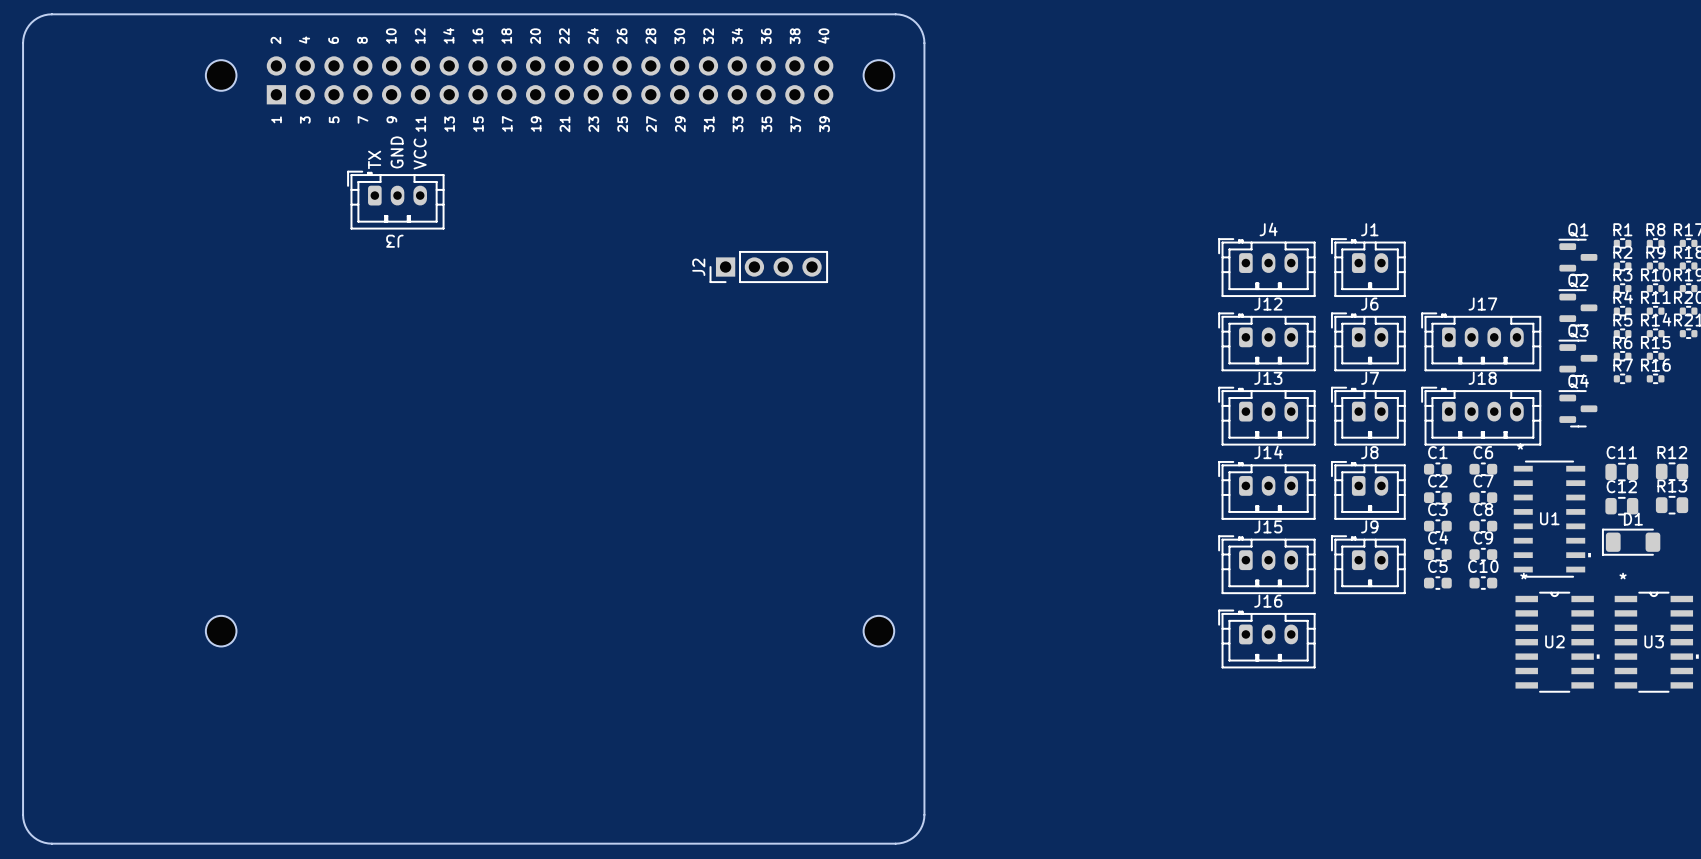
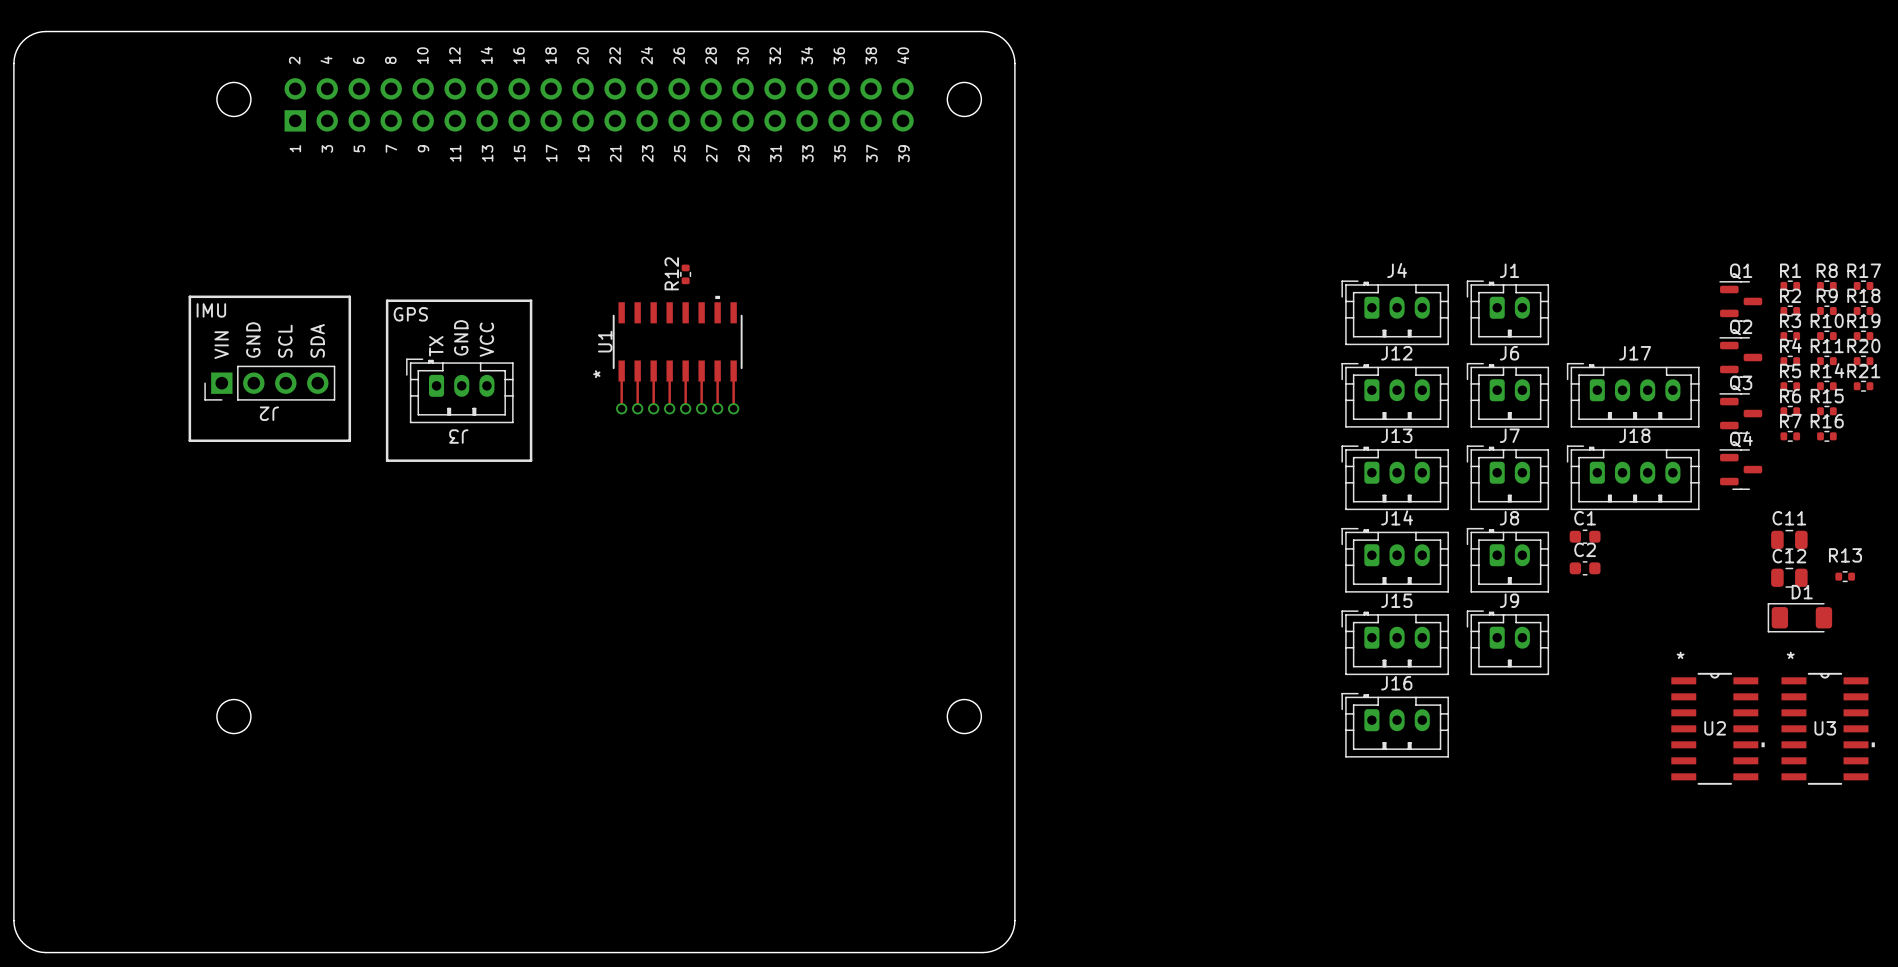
J3 position: (395, 200) -> (459, 390)
line: none -> (189, 296) (349, 296) (349, 440) (189, 440) (189, 296)
line: none -> (387, 300) (531, 300) (531, 460) (387, 460) (387, 300)
text: none -> IMU (211, 310)
J2 name rotation: 0° (698, 267) -> 90° counterclockwise (269, 413)
J2 name position: J2 (698, 267) -> J2 (269, 413)
J2 position: (768, 267) -> (269, 383)
text: none -> GPS (410, 314)
text: none -> GND (253, 340)
text: none -> SDA (317, 340)
text: none -> SCL (285, 341)
text: none -> VIN (221, 345)
track: none -> (621, 371) (621, 408)
track: none -> (637, 371) (637, 408)
track: none -> (653, 371) (653, 408)
track: none -> (669, 371) (669, 408)
track: none -> (685, 371) (685, 408)
track: none -> (701, 371) (701, 408)
track: none -> (717, 371) (717, 408)
track: none -> (733, 371) (733, 408)
via: none -> (621, 408)
via: none -> (637, 408)
via: none -> (653, 408)
via: none -> (669, 408)
via: none -> (685, 408)
via: none -> (701, 408)
via: none -> (717, 408)
via: none -> (733, 408)
R12 footprint: [1655, 462, 1689, 481] -> [680, 264, 692, 285]
C6: (1483, 469) -> none
R13 footprint: [1655, 496, 1689, 515] -> [1835, 571, 1855, 583]
C7: (1483, 497) -> none
U1 name position: U1 (1549, 518) -> U1 (605, 341)
U1 rotation: 0° (1552, 519) -> 90° counterclockwise (677, 338)
U1 position: (1552, 519) -> (677, 338)
C3: (1437, 526) -> none
C8: (1483, 526) -> none
C4: (1437, 554) -> none
C9: (1483, 554) -> none
C5: (1437, 583) -> none
C10: (1483, 583) -> none

